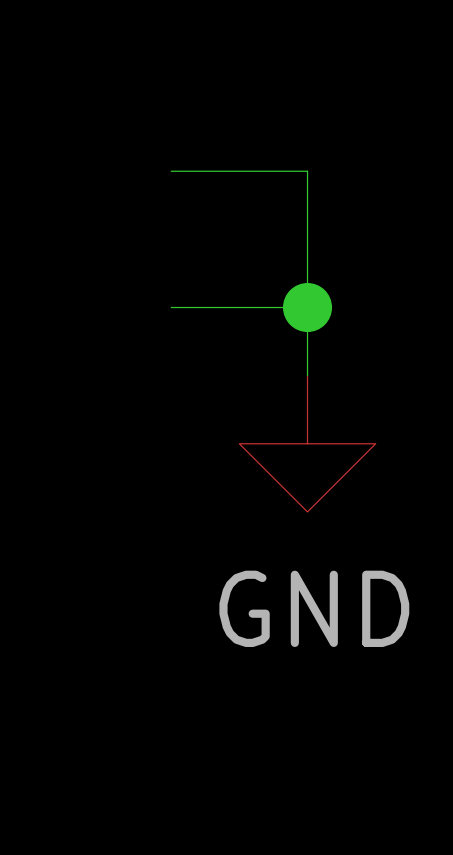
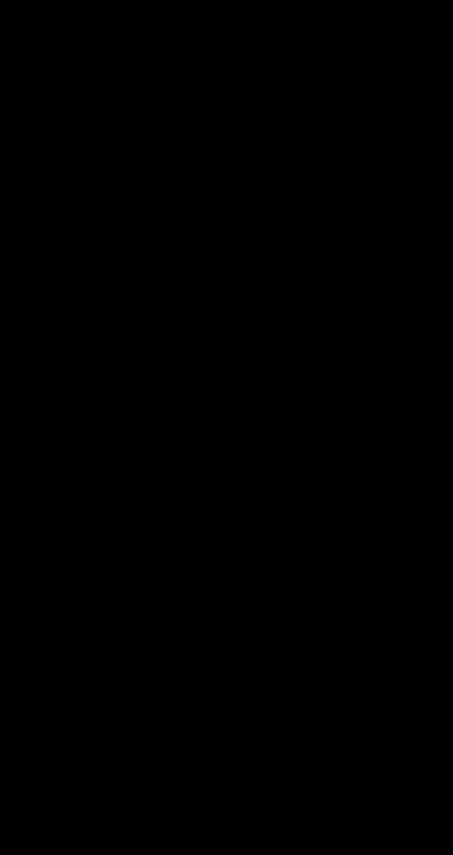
wire: (171, 171) (307, 171) (307, 375) -> none
wire: (171, 307) (307, 307) -> none
junction: (307, 307) -> none
power symbol: GND (307, 443) -> none

